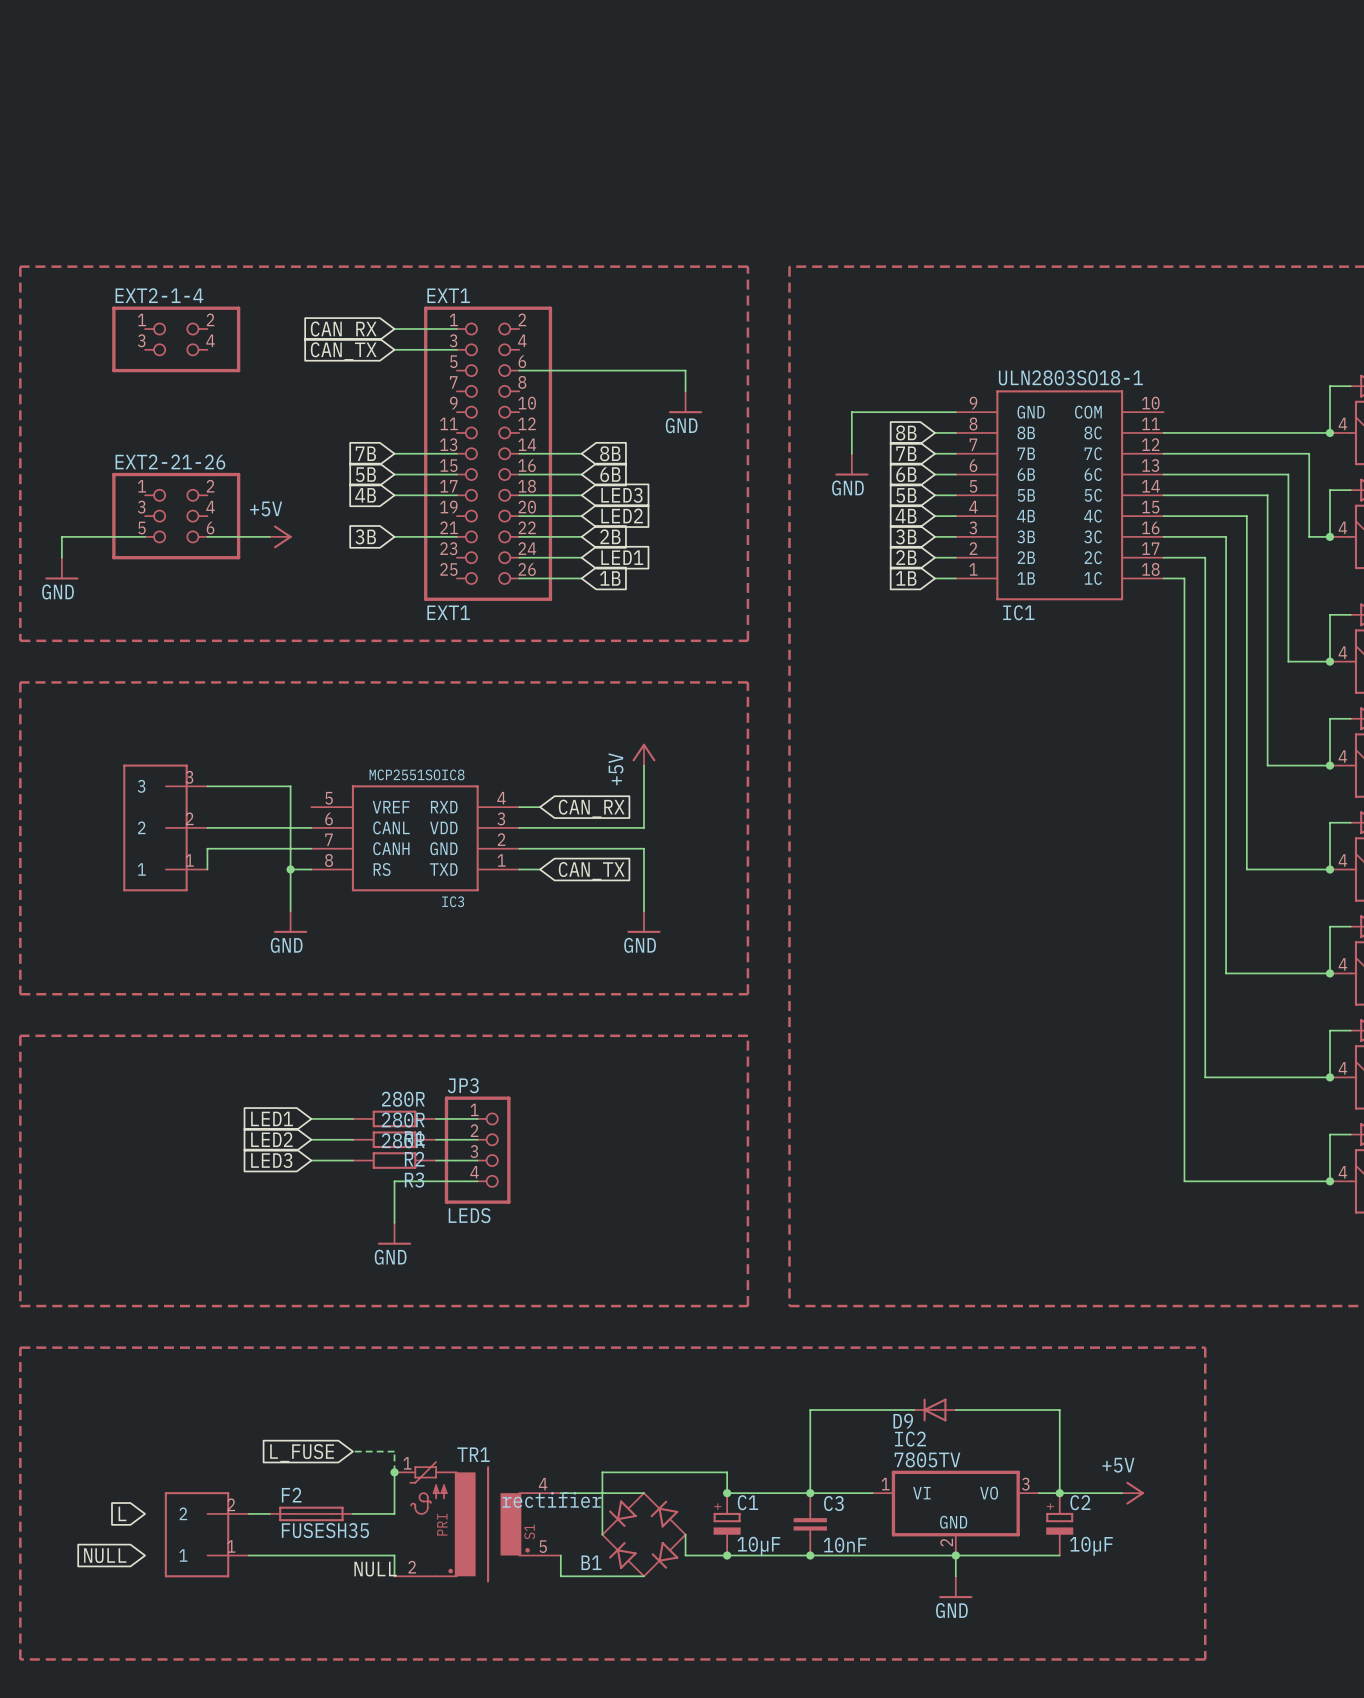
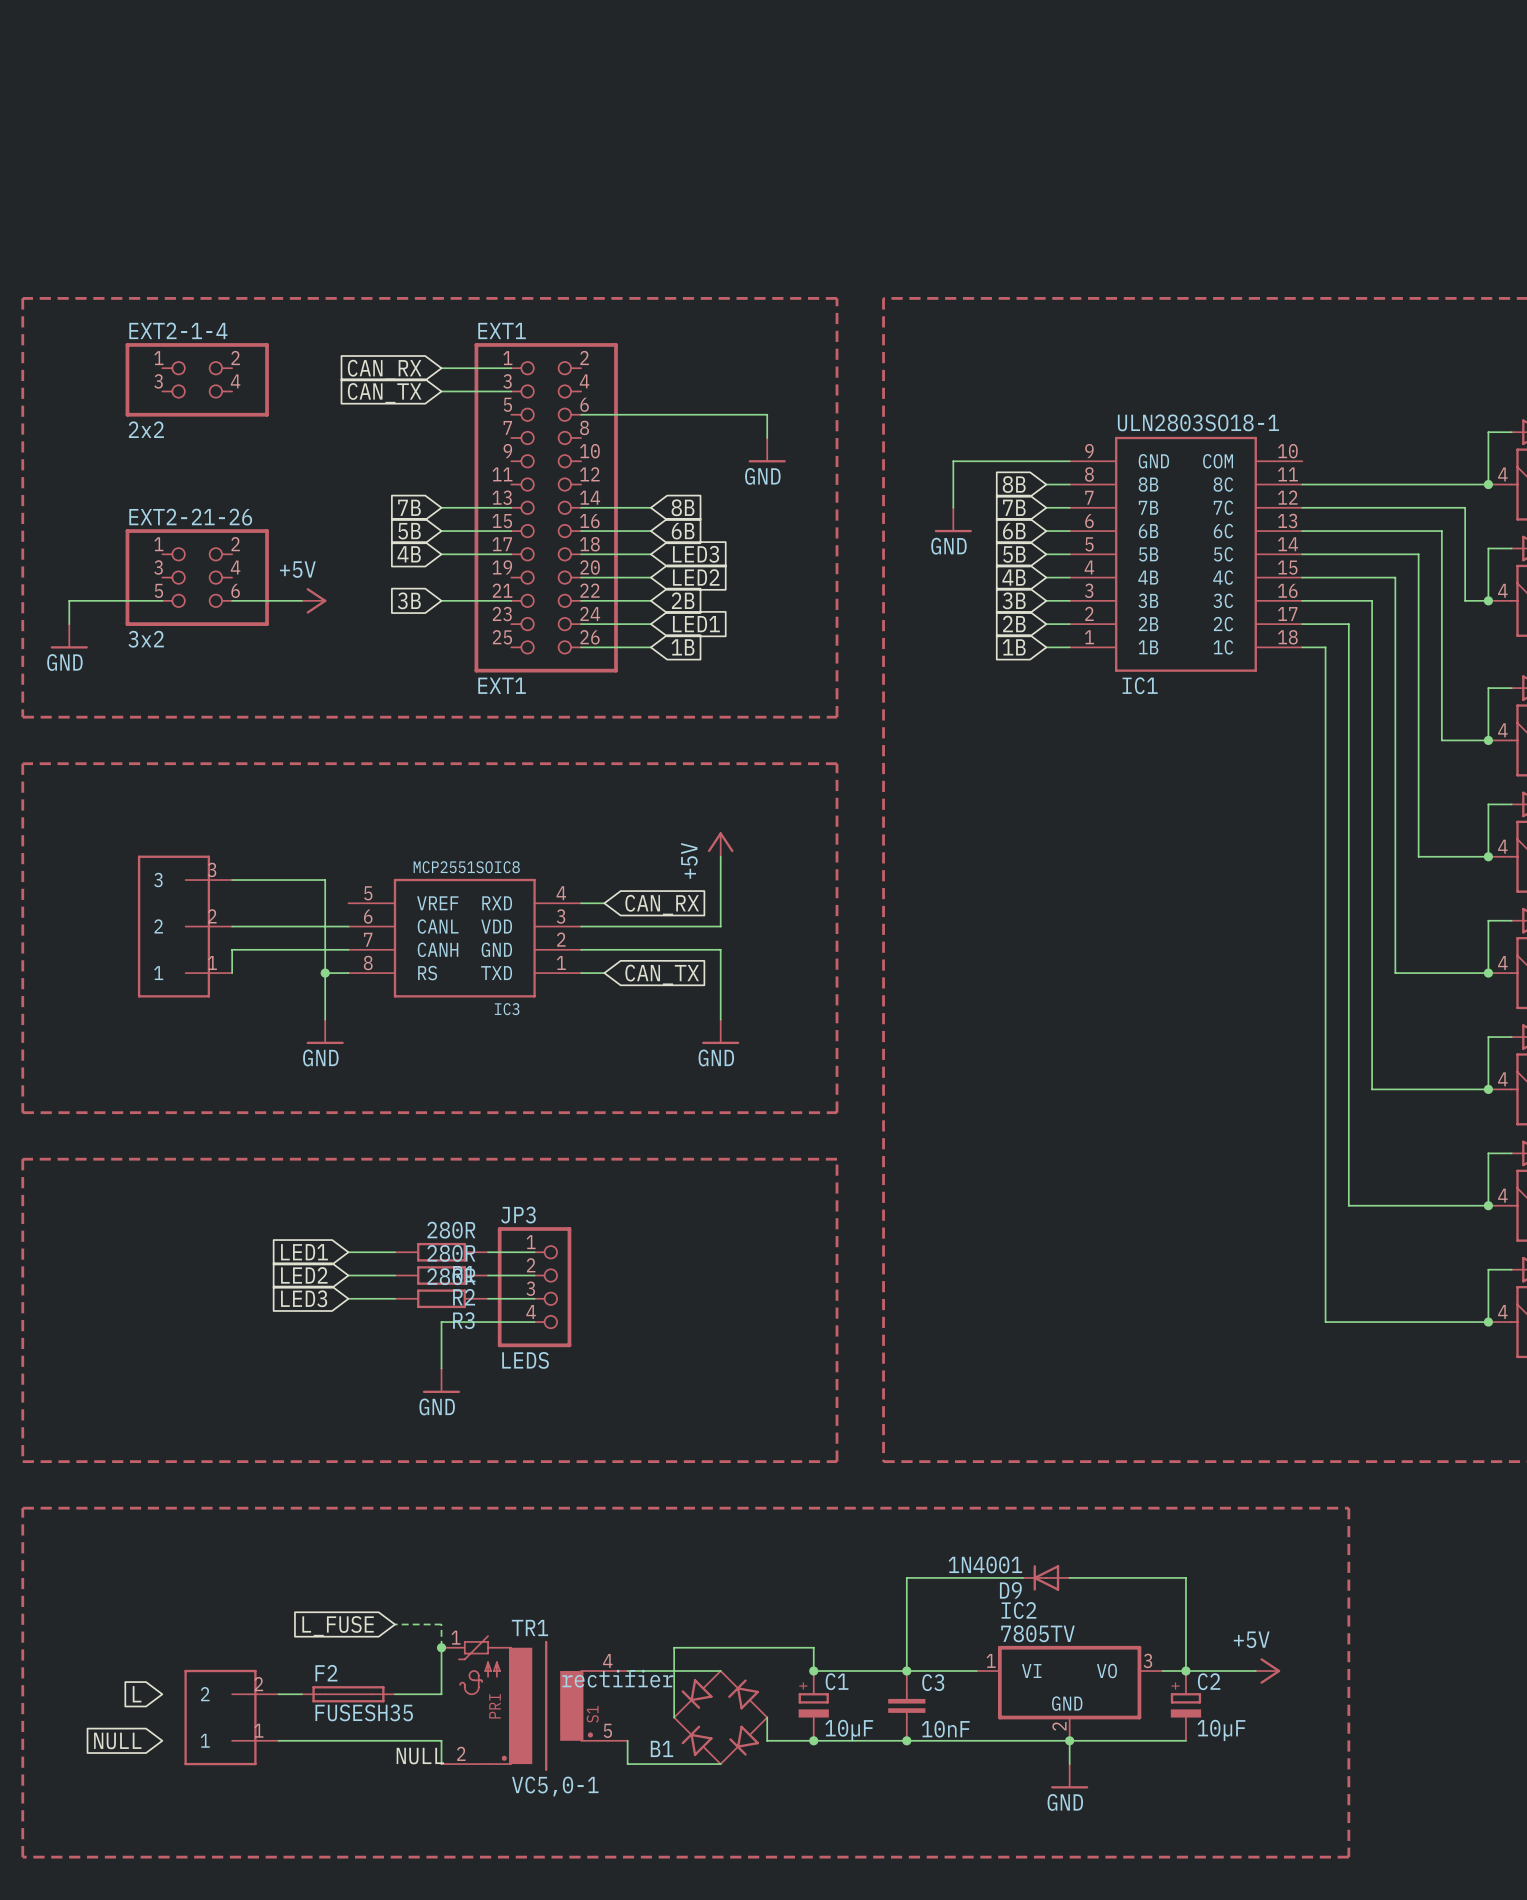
EXT2-1-4 value: none -> 2x2 (146, 429)
EXT2-21-26 value: none -> 3x2 (146, 639)
D9 value: none -> 1N4001 (985, 1564)
TR1 value: none -> VC5,0-1 (555, 1786)

